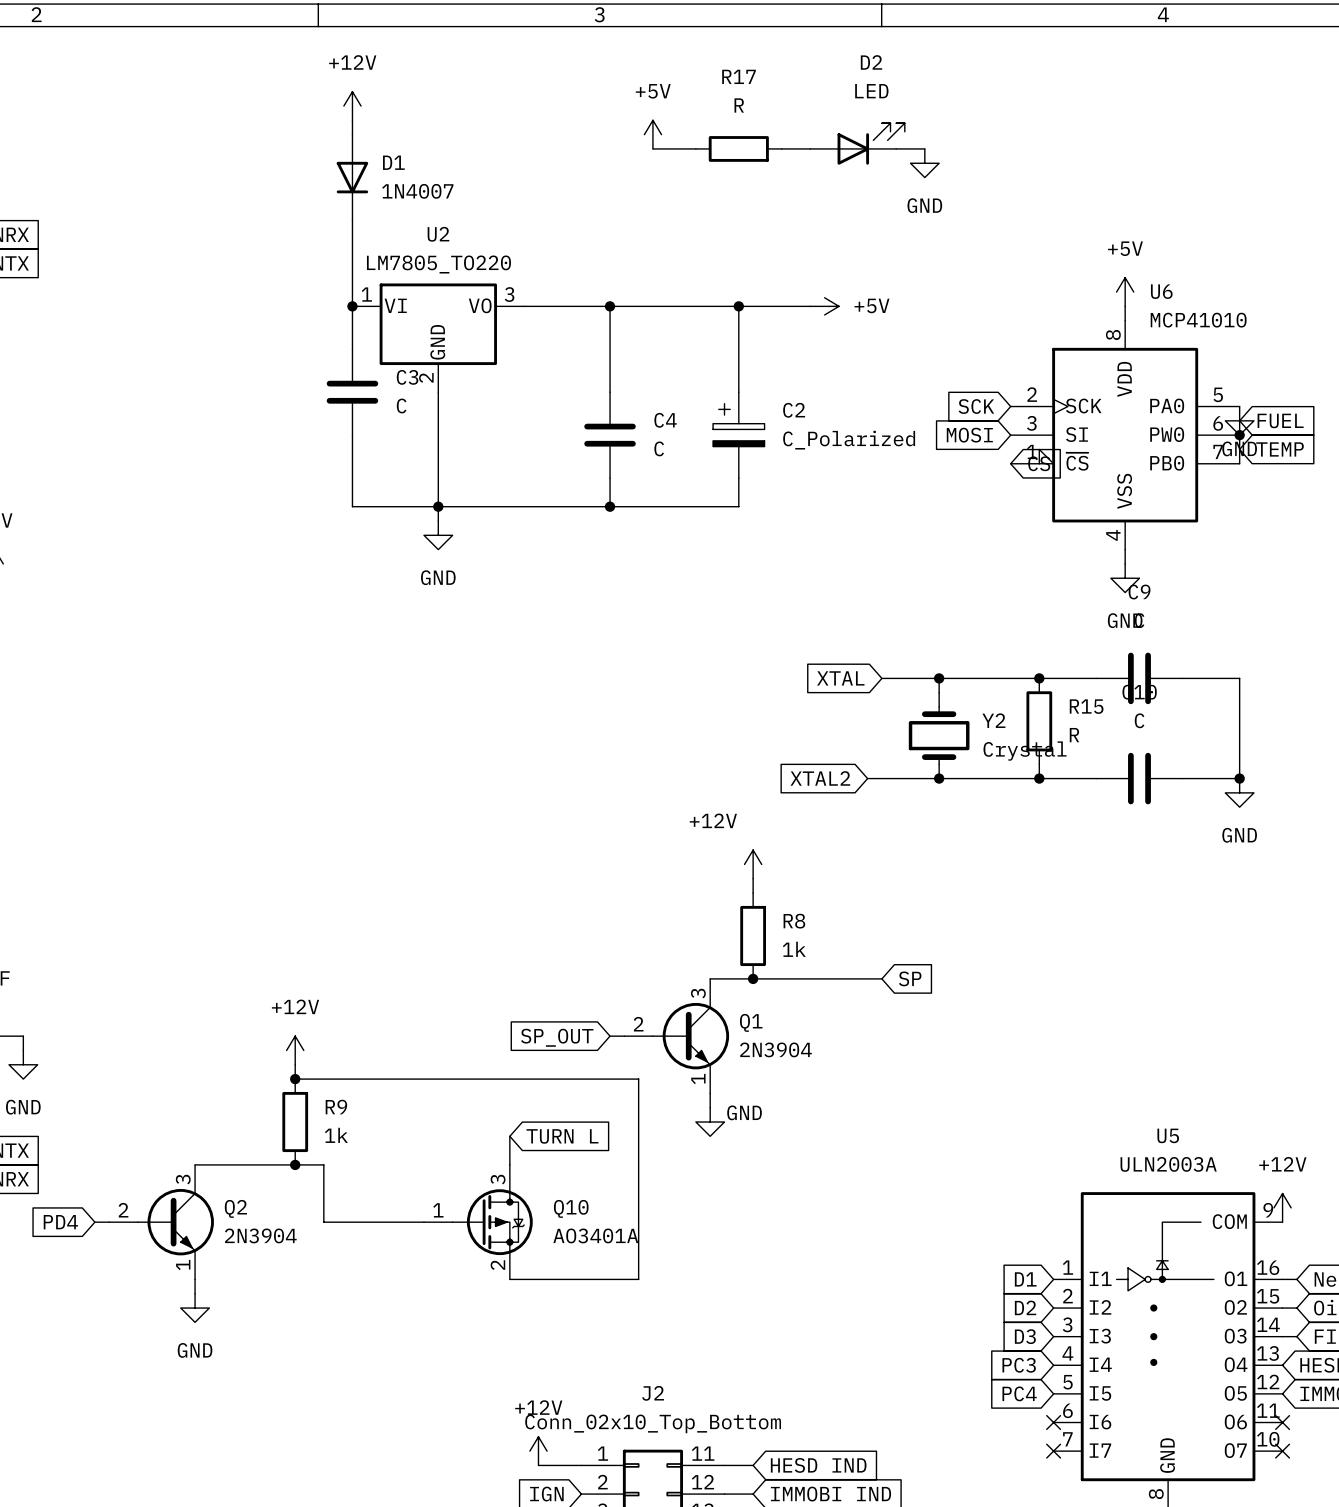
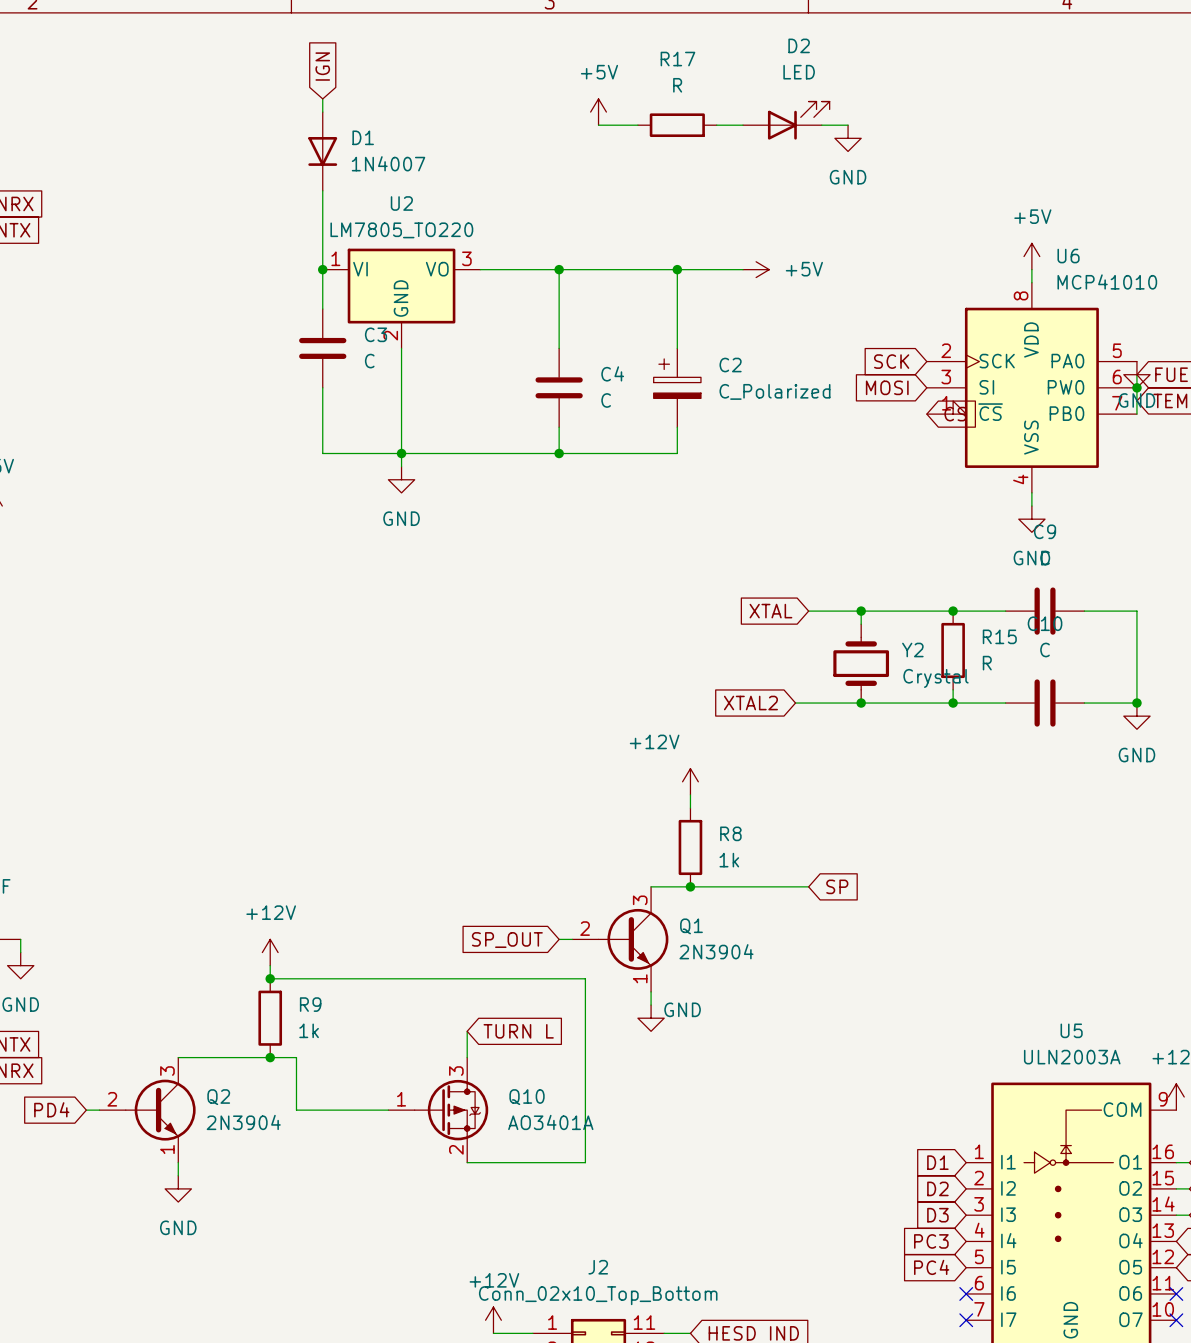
global label: none -> IGN (322, 66)
power symbol: +12V (352, 106) -> none

